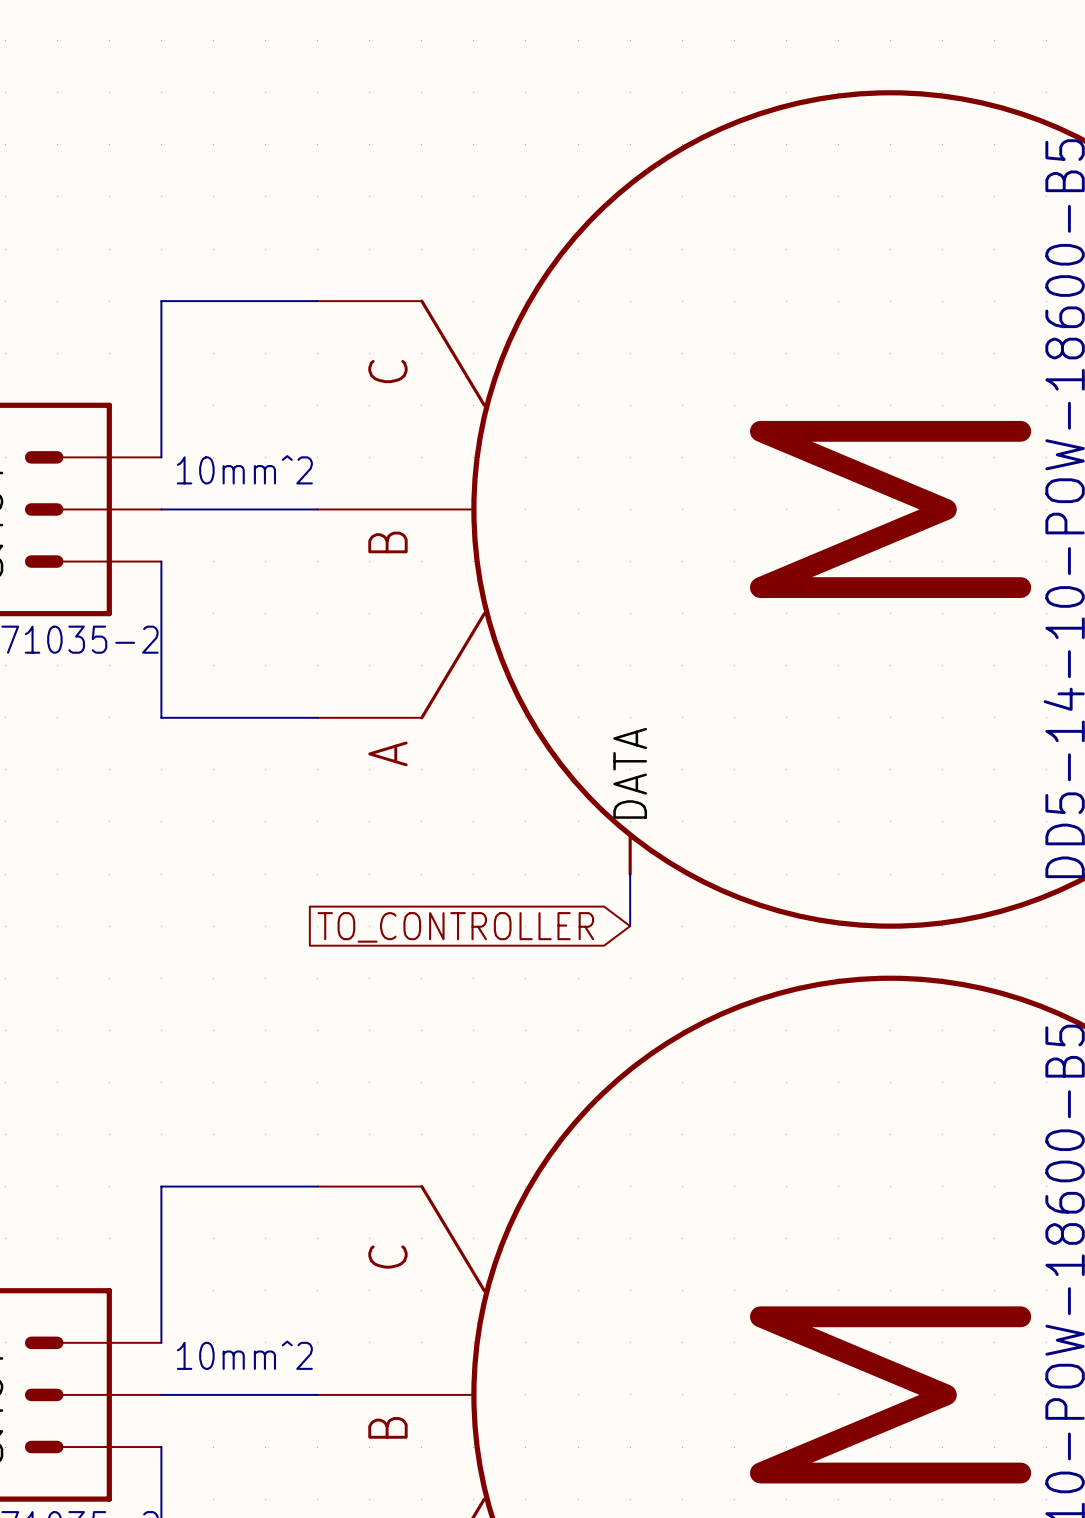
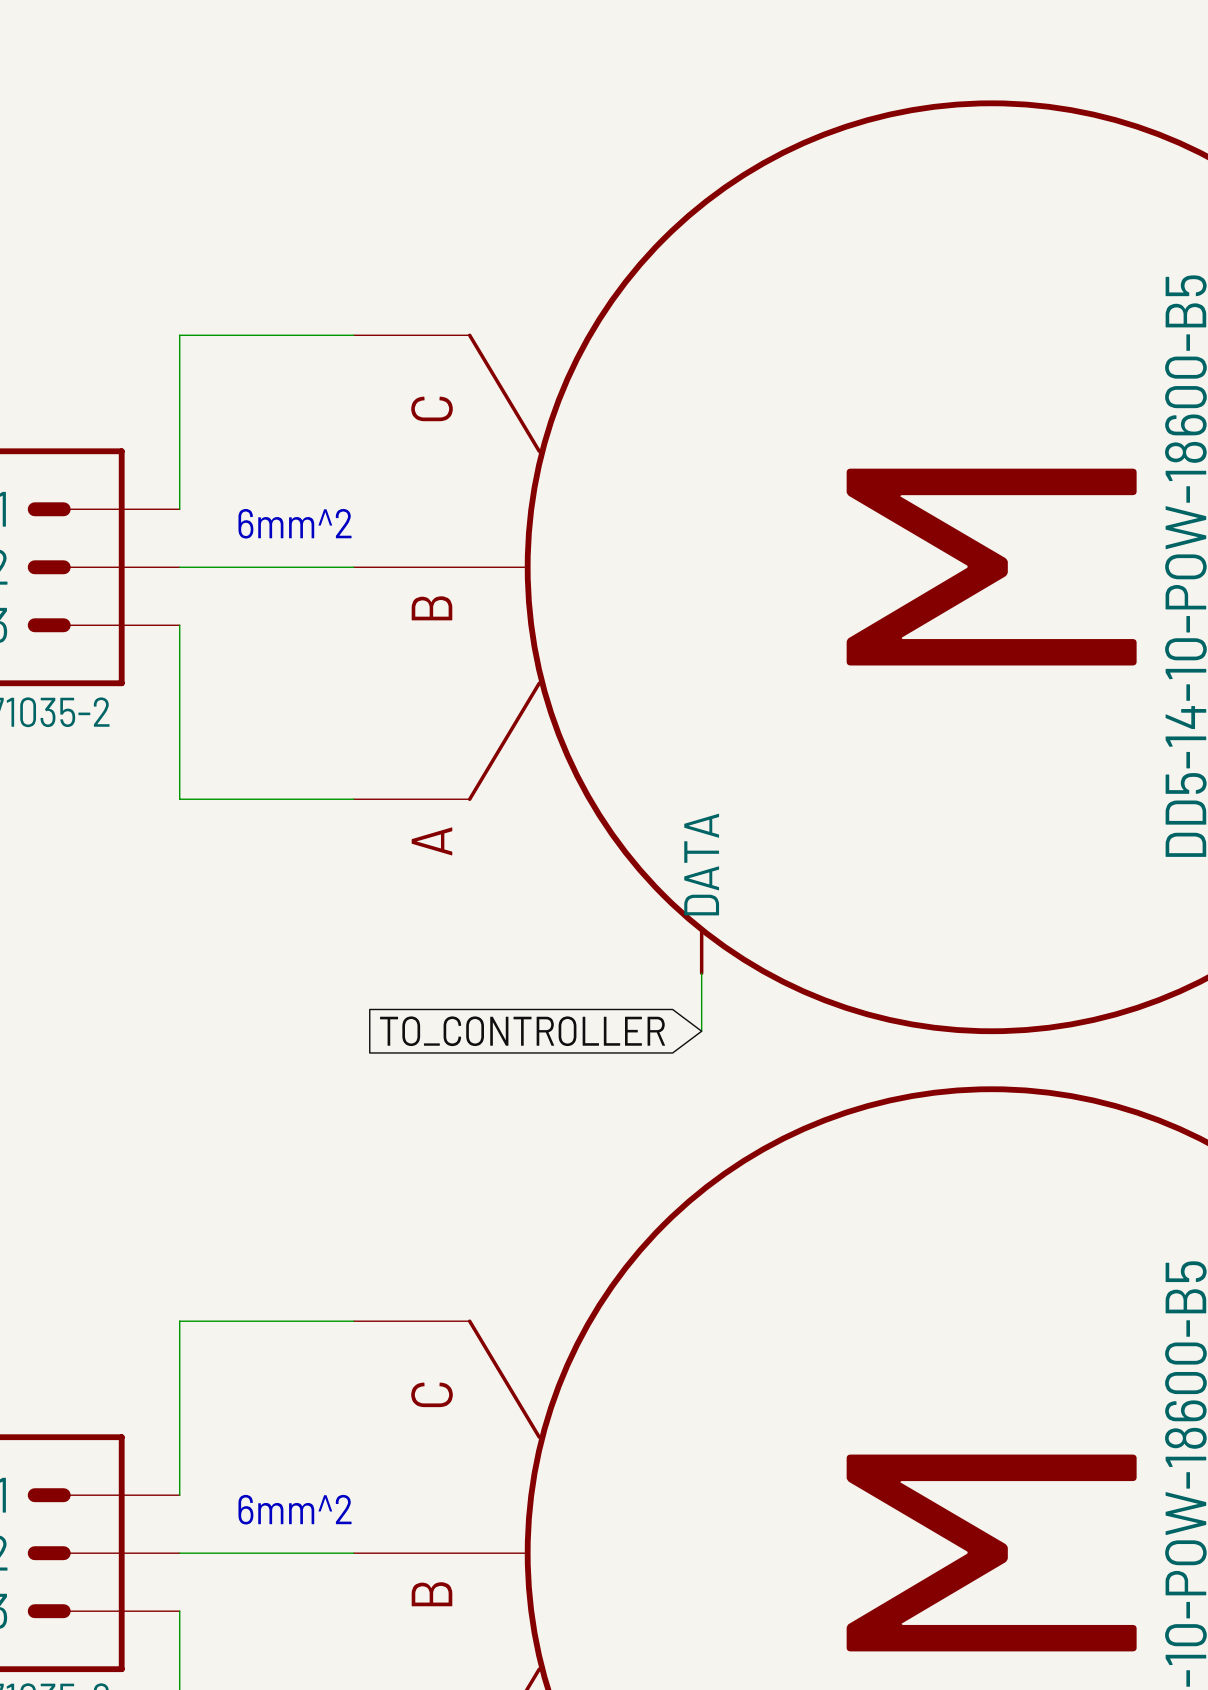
text: 10mm^2 (244, 469) -> 6mm^2 (295, 523)
text: 10mm^2 (244, 1355) -> 6mm^2 (295, 1509)

